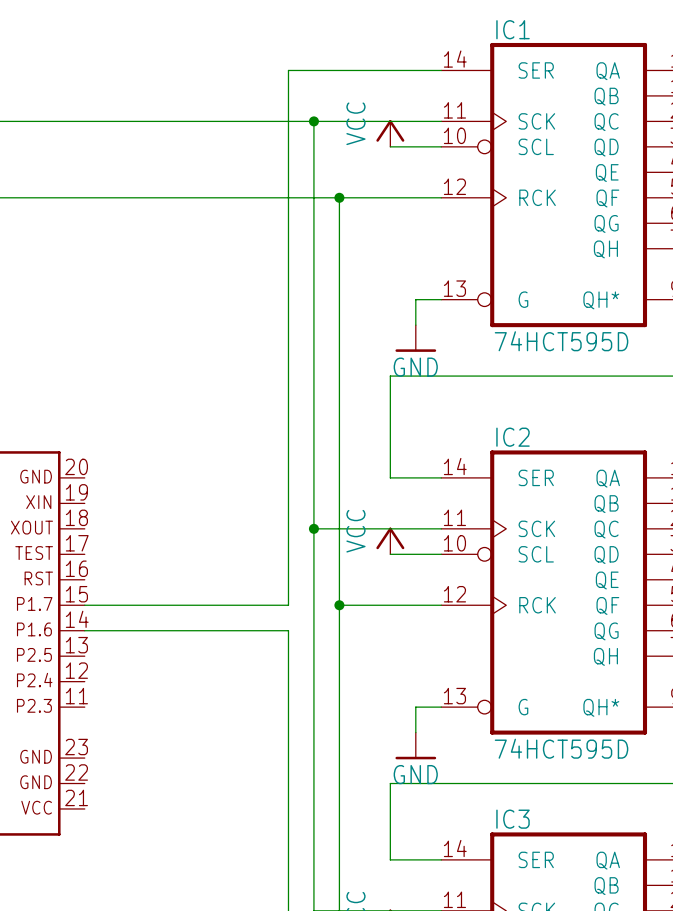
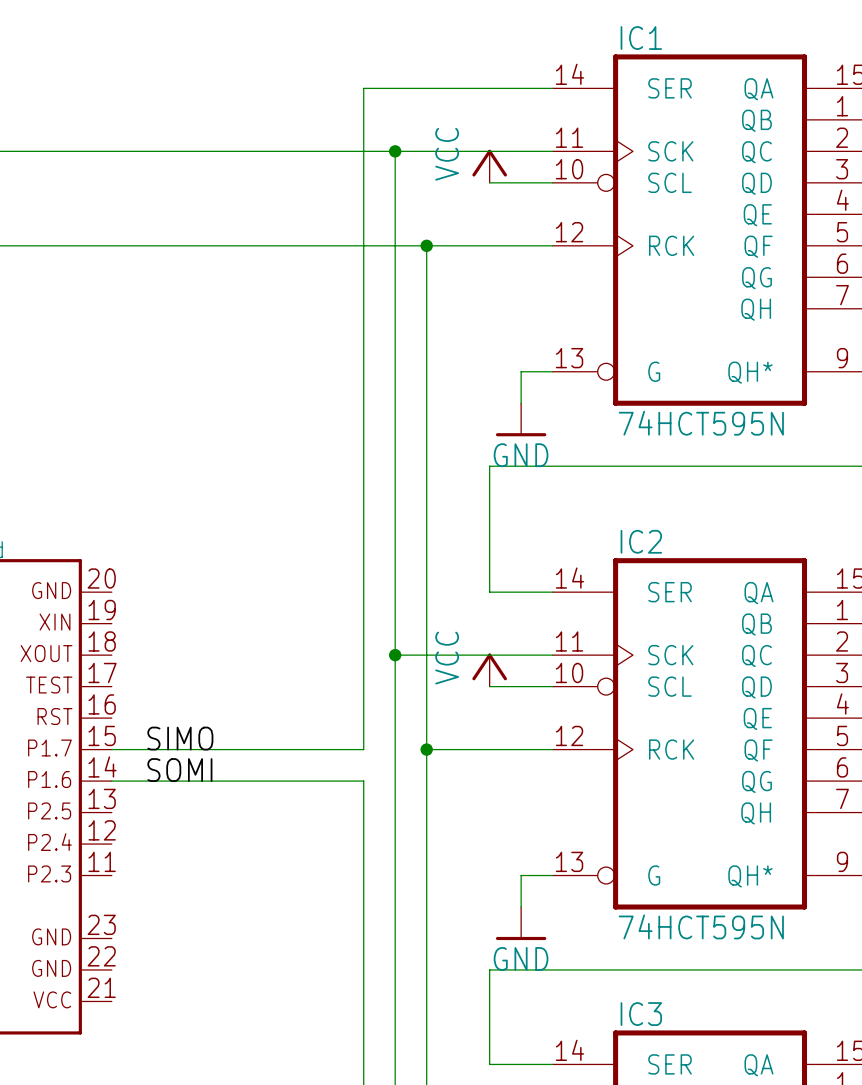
IC1 value: 74HCT595D (561, 341) -> 74HCT595N (701, 423)
label: none -> SIMO (180, 738)
label: none -> SOMI (179, 770)
IC2 value: 74HCT595D (561, 748) -> 74HCT595N (701, 926)

